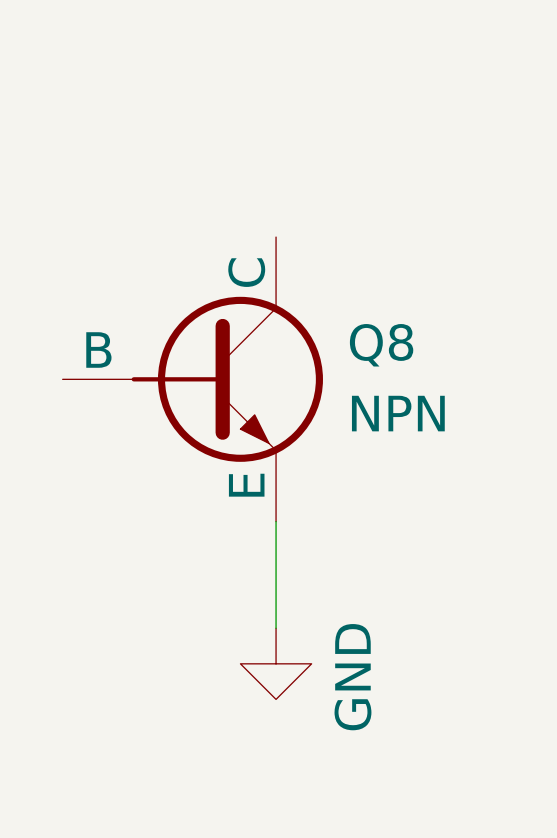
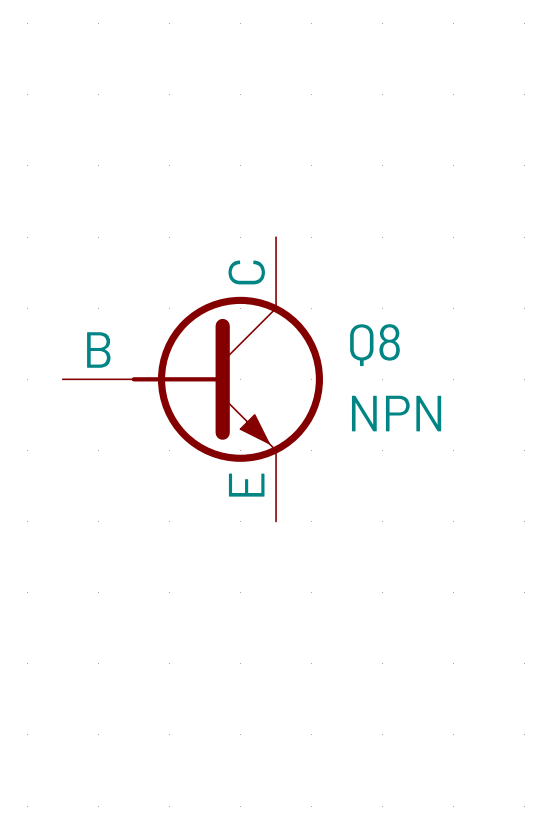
wire: (276, 521) (276, 628) -> none
power symbol: GND (276, 663) -> none

